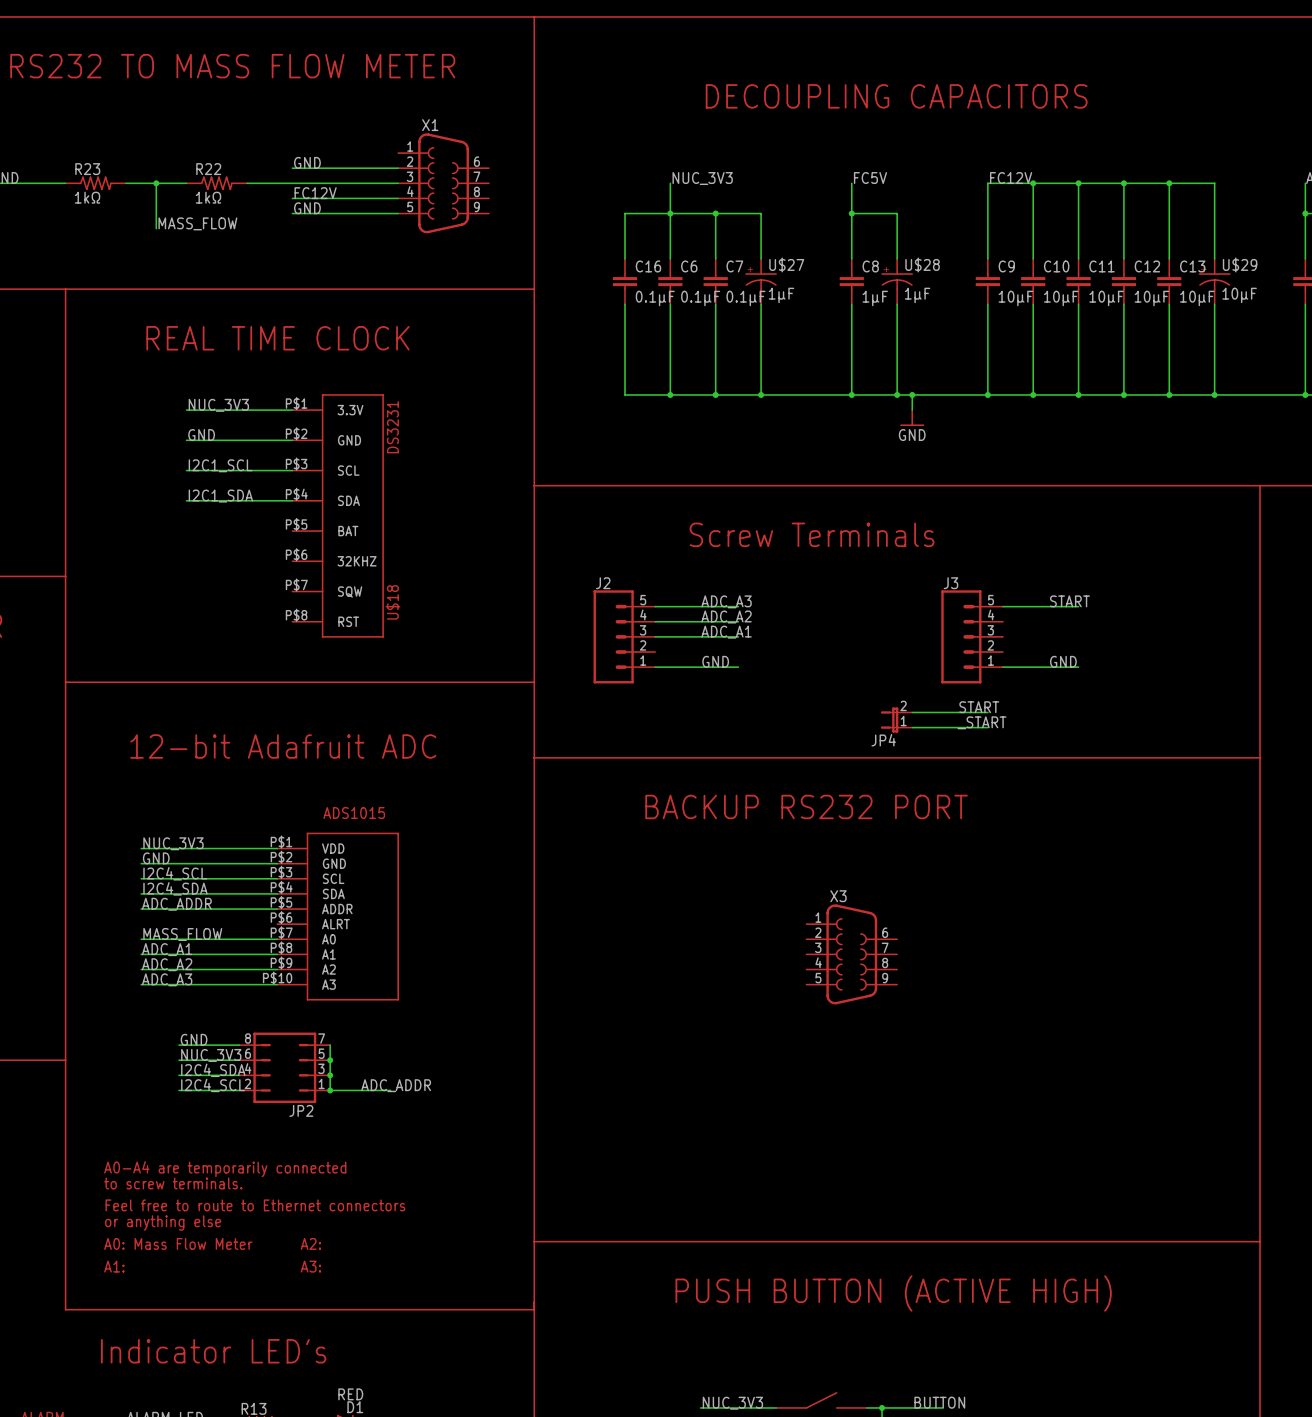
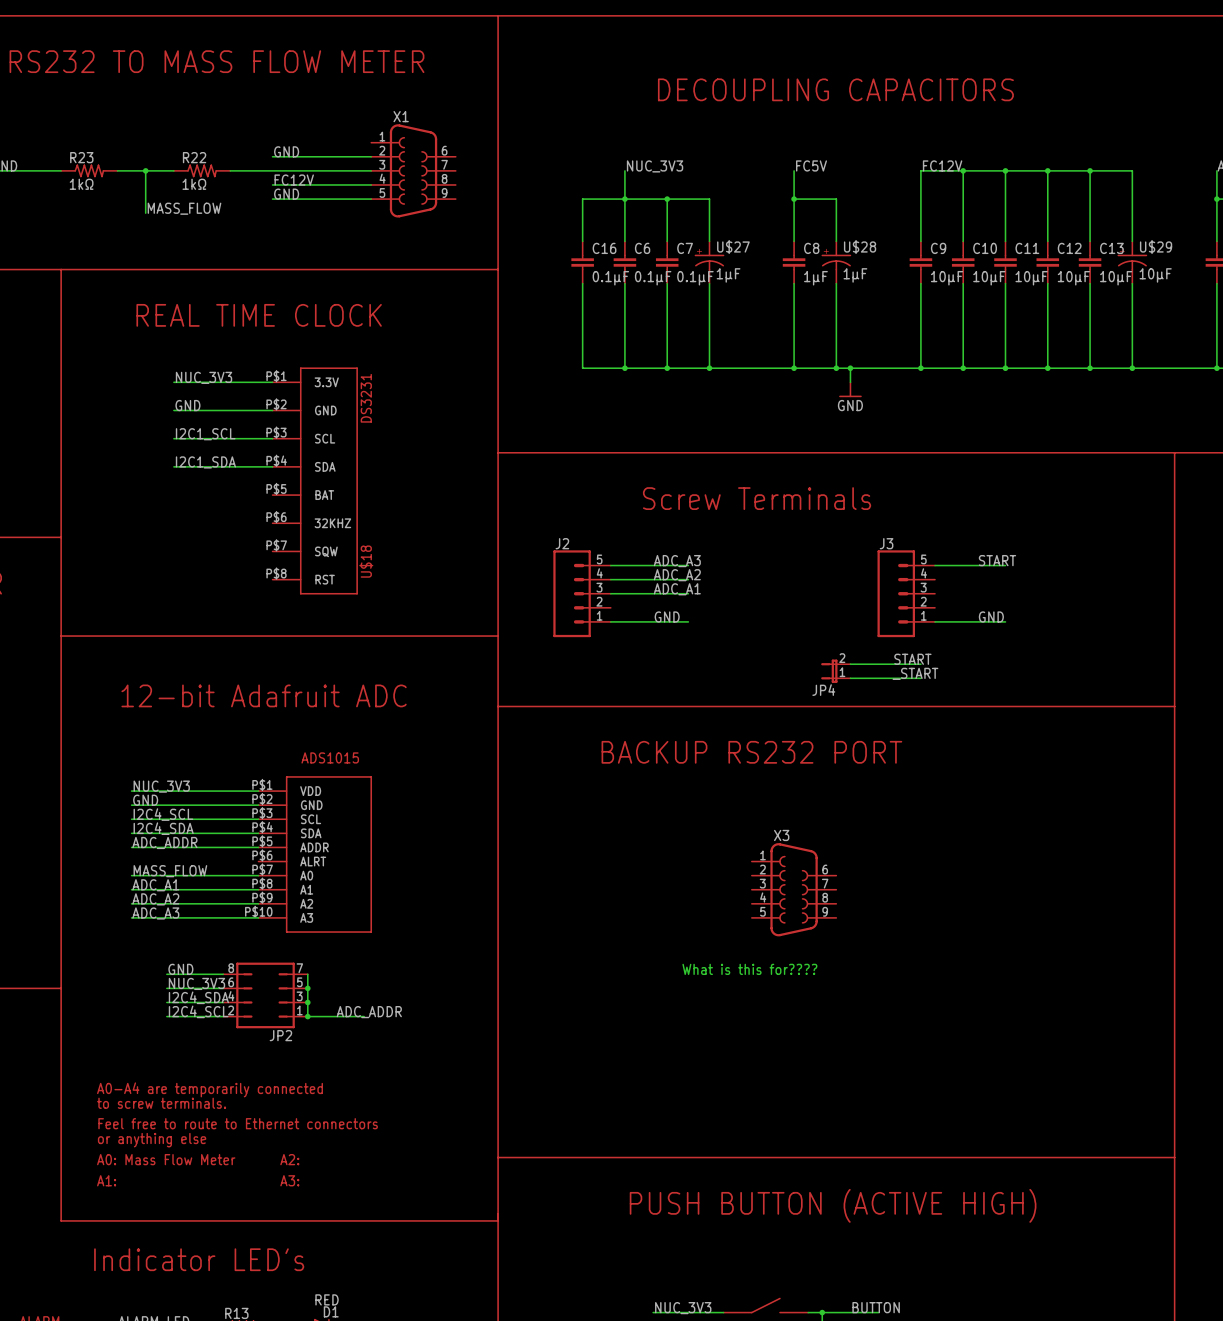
text: none -> What is this for???? (749, 969)

